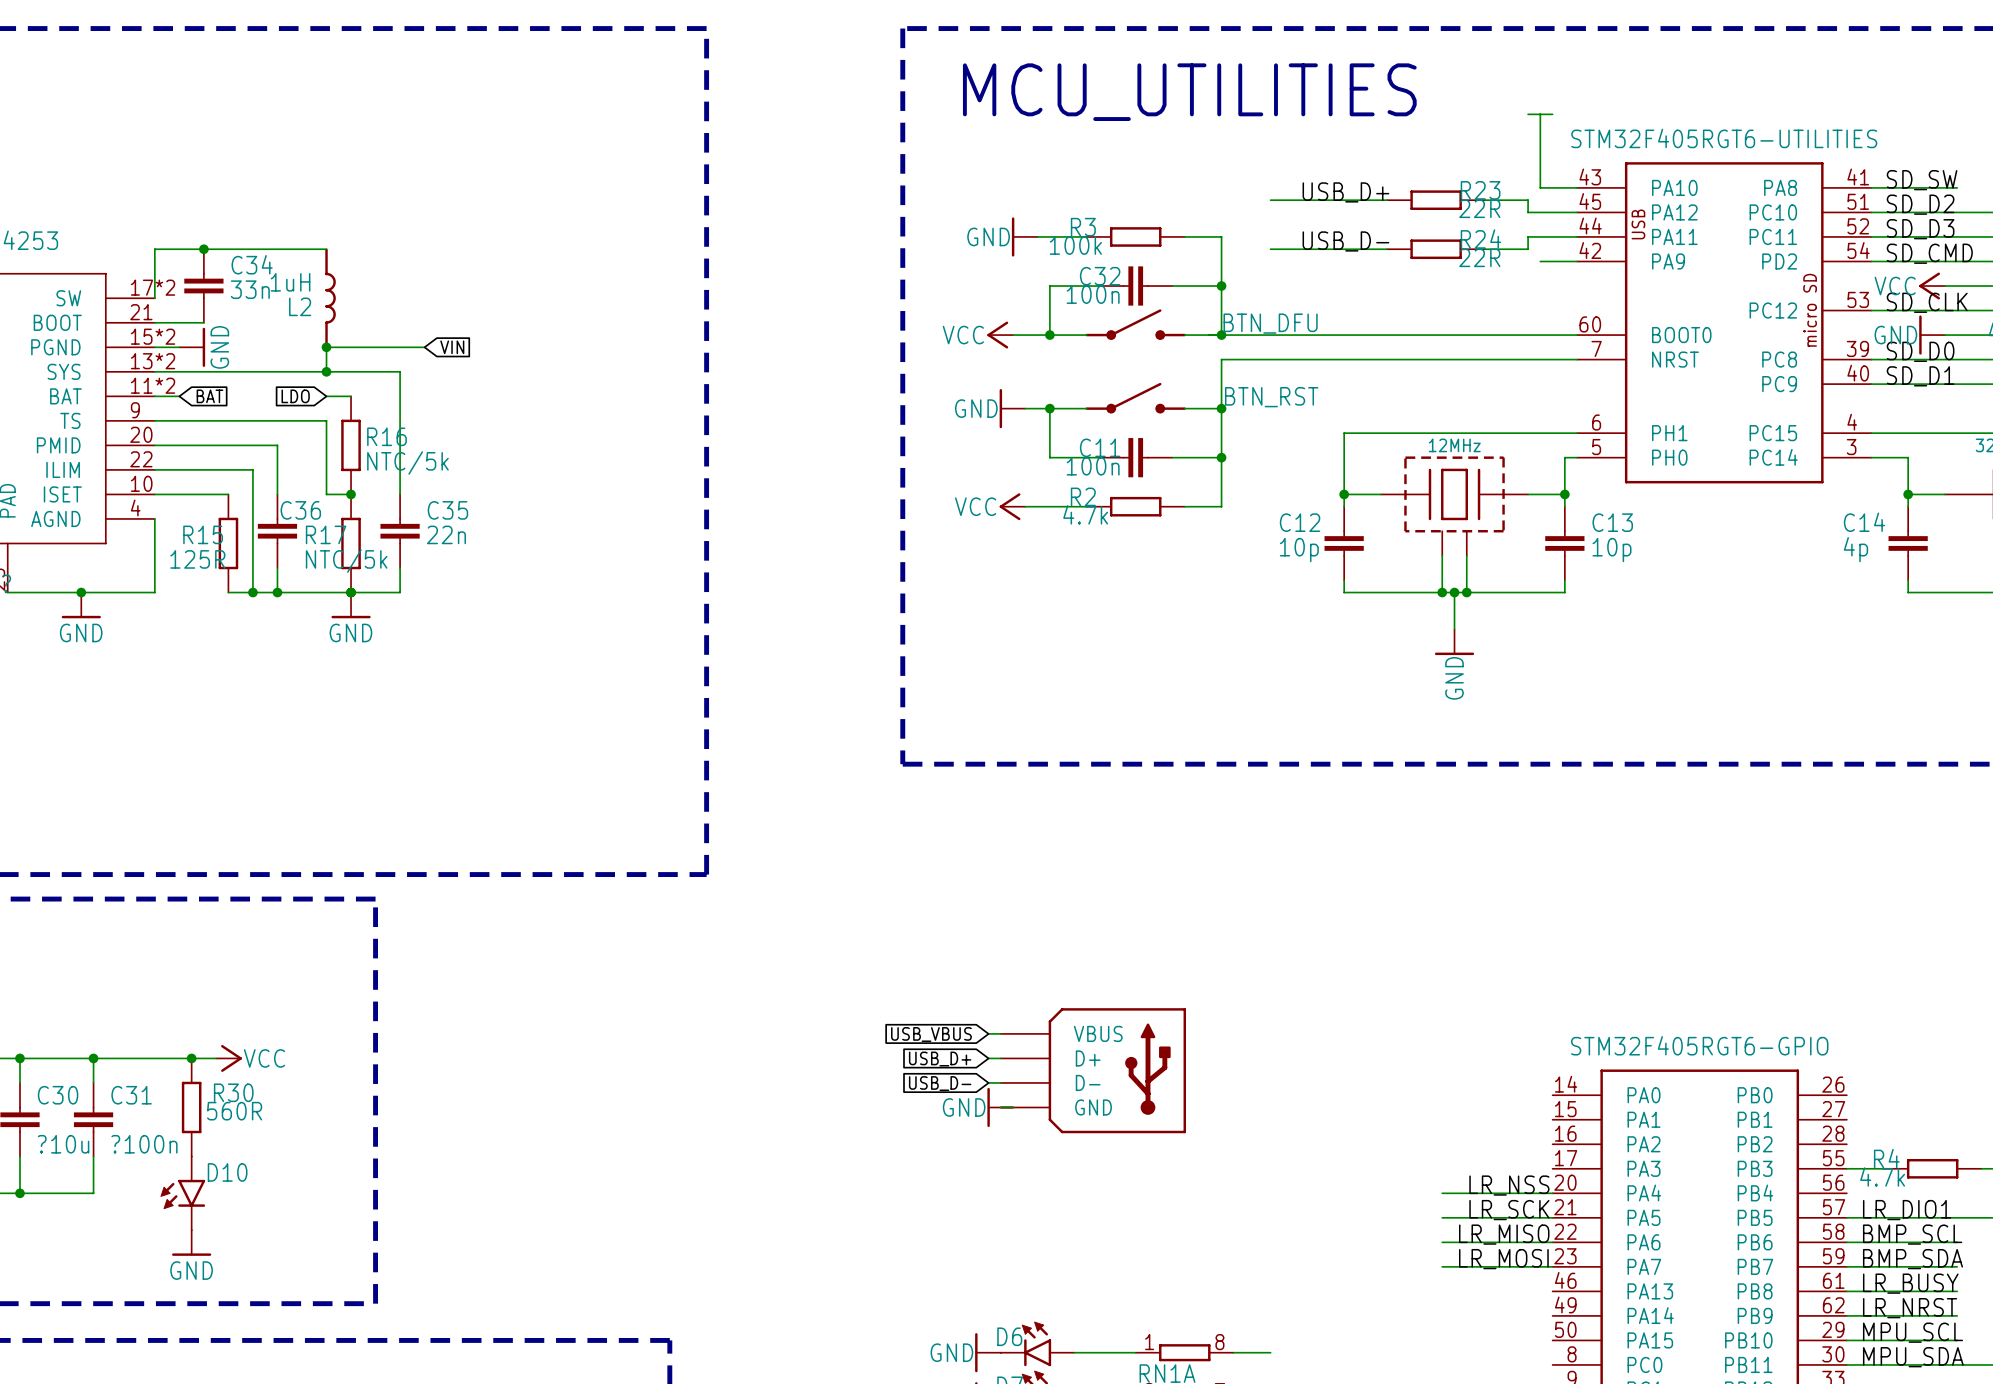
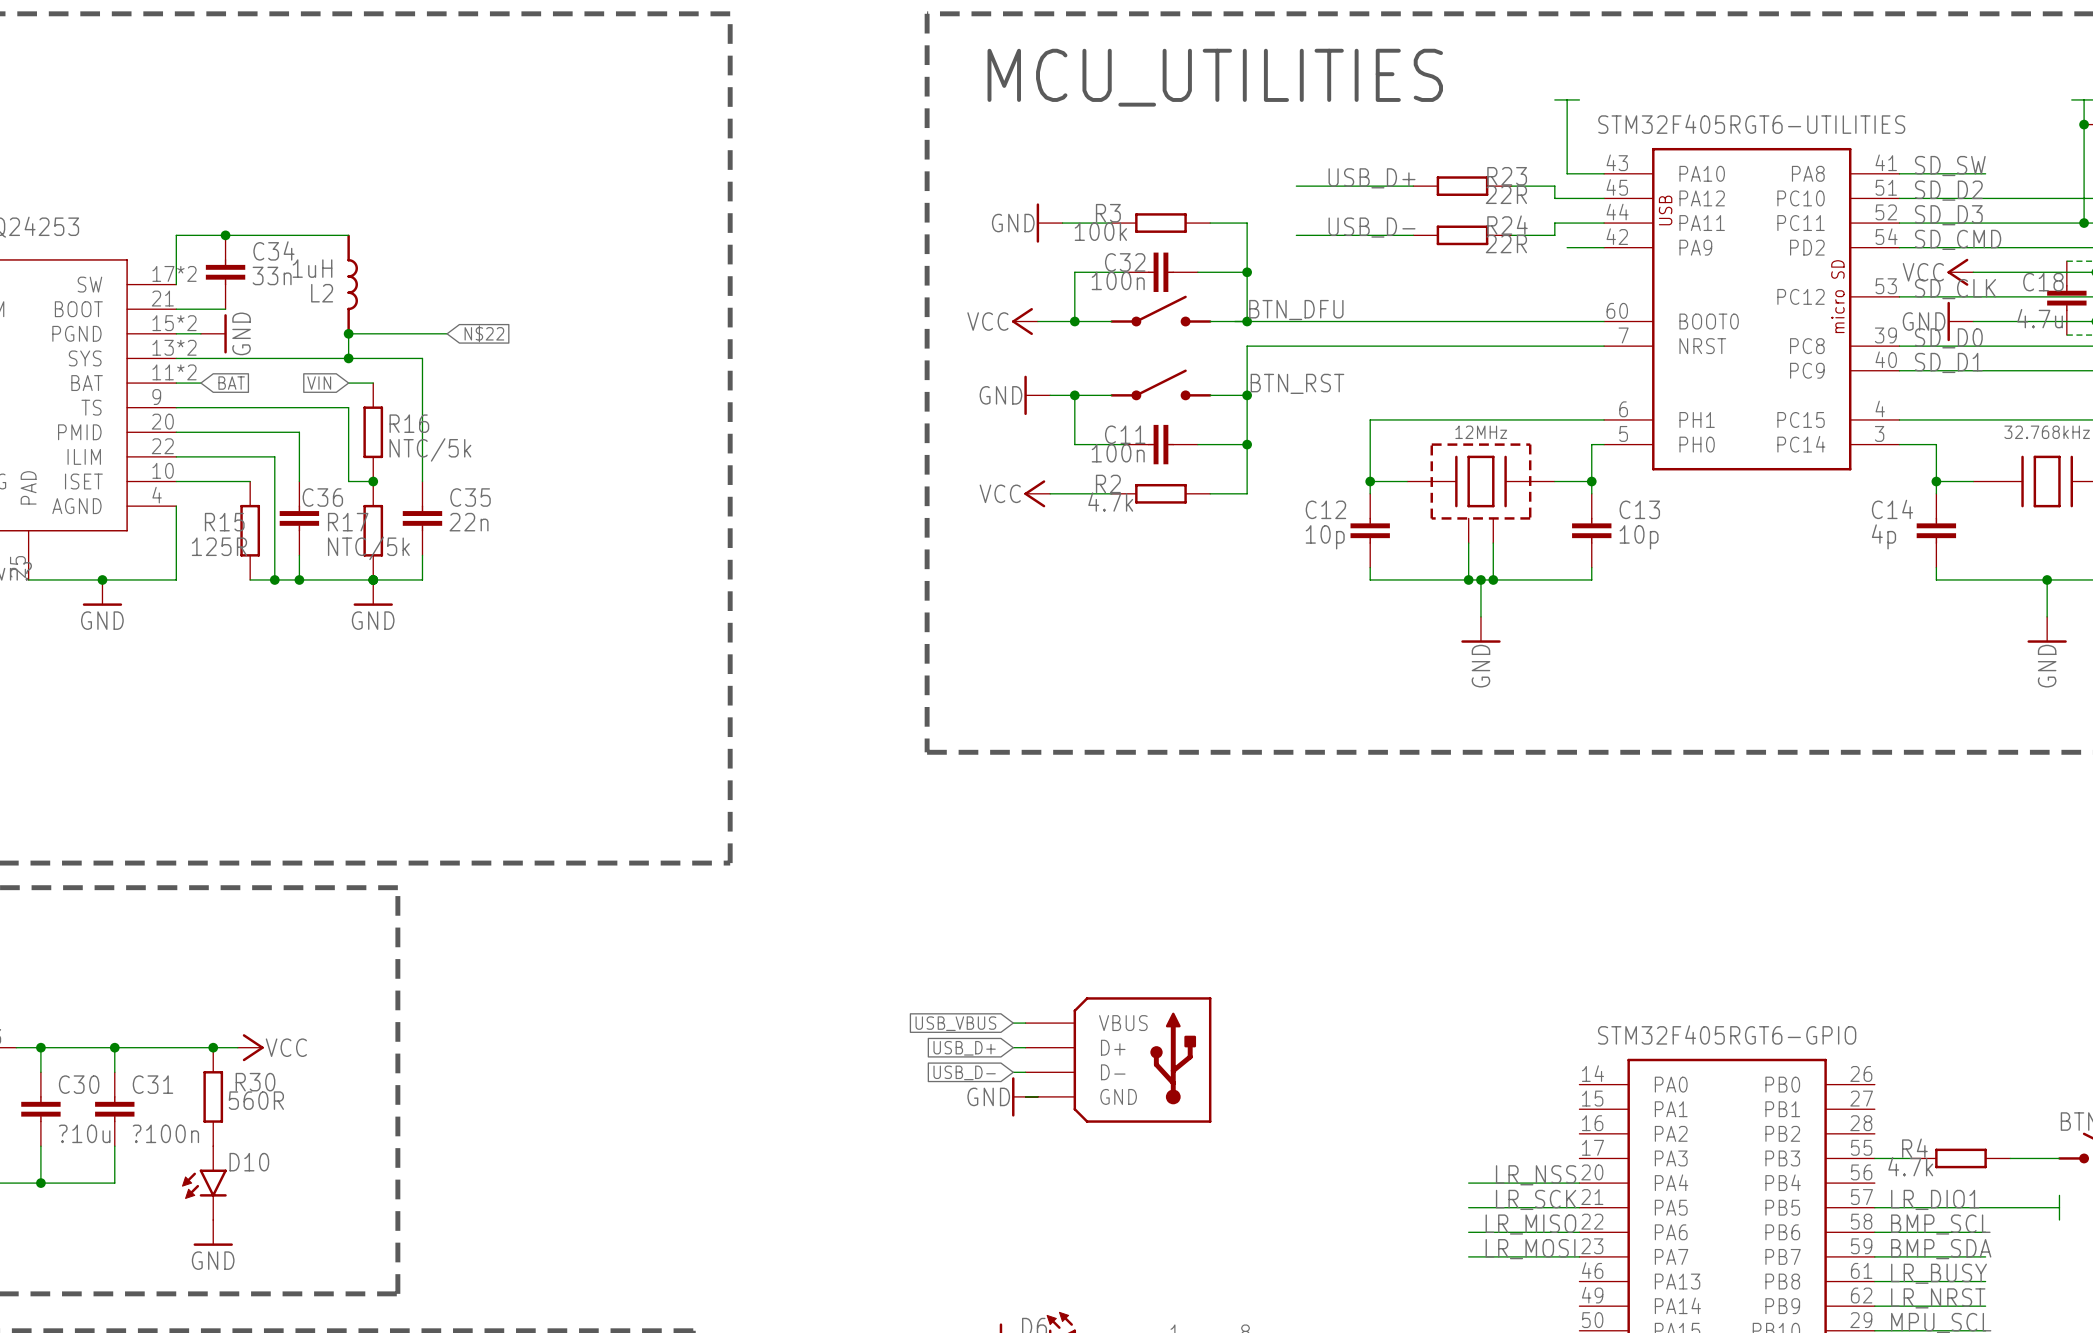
global label: VIN (452, 347) -> N$22 (484, 333)
global label: LDO (295, 396) -> VIN (319, 383)

